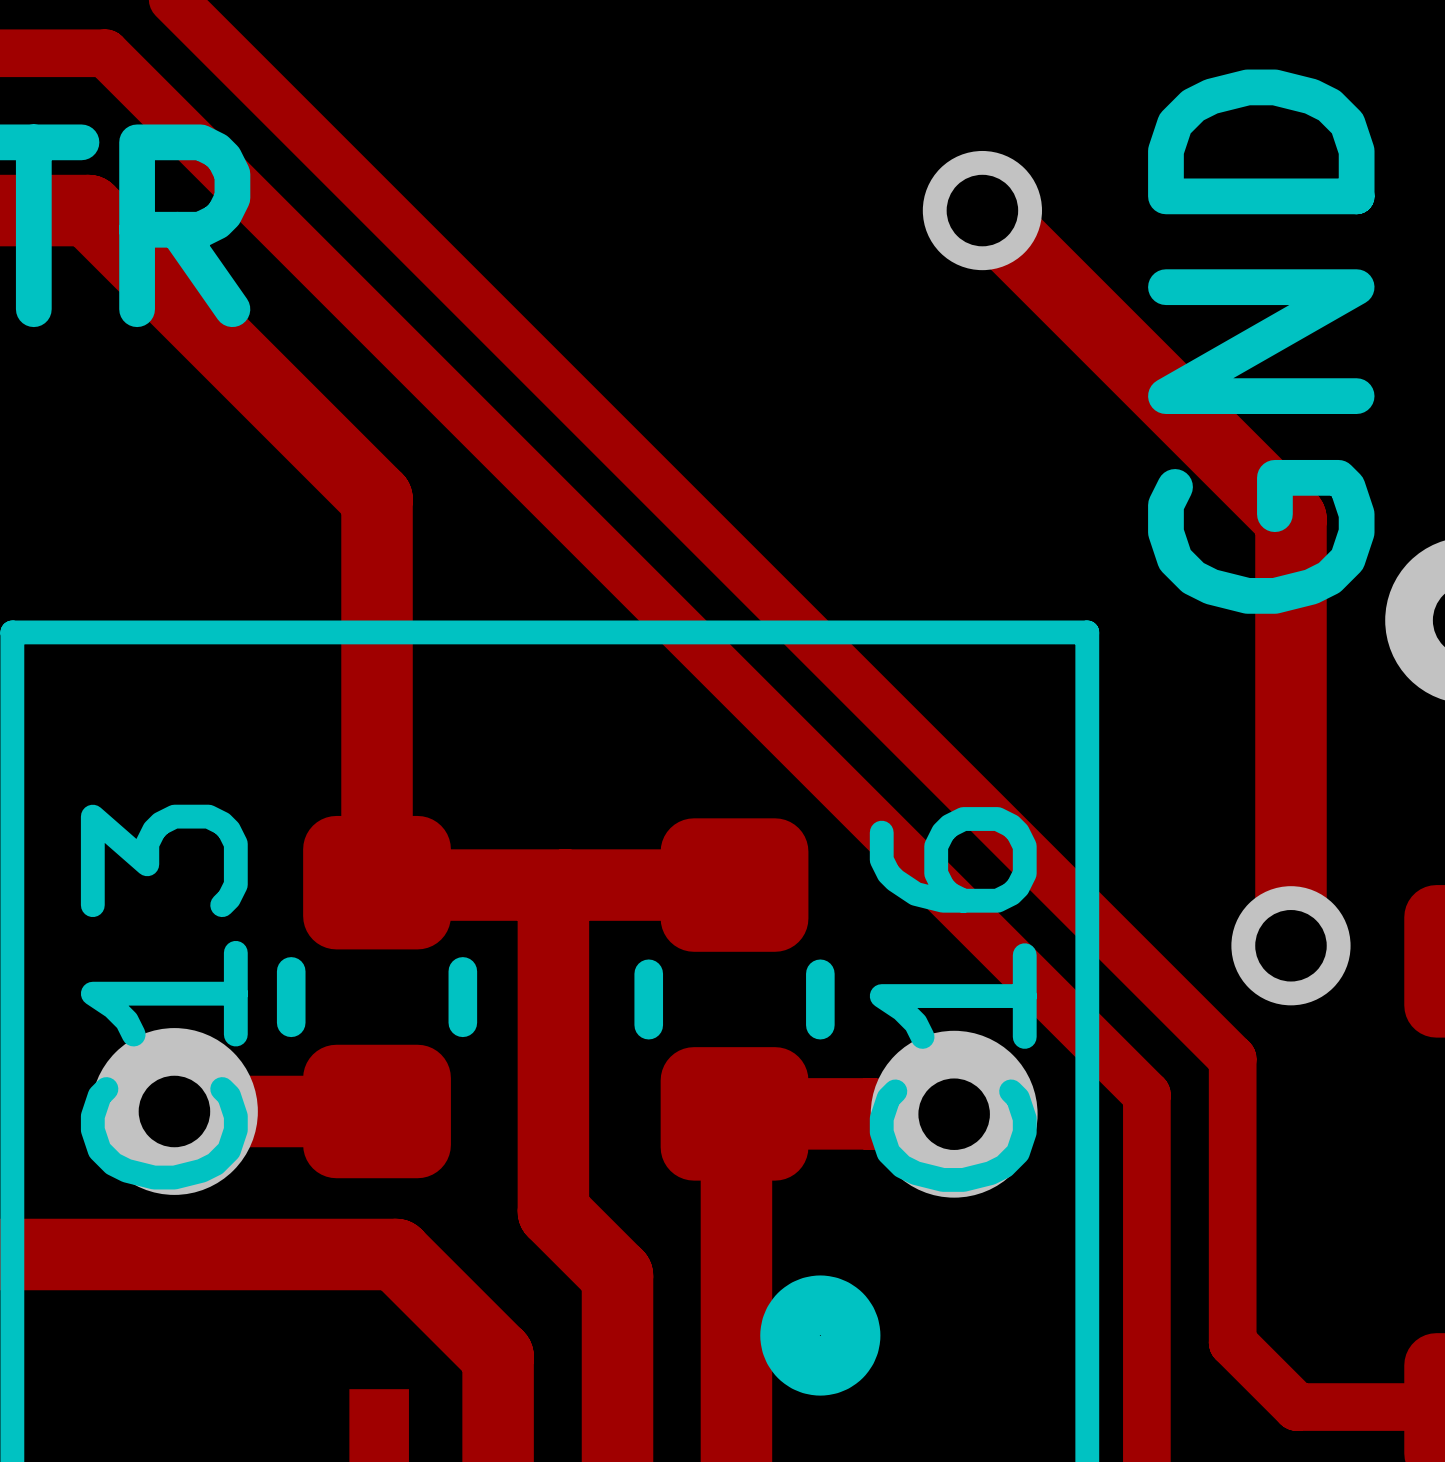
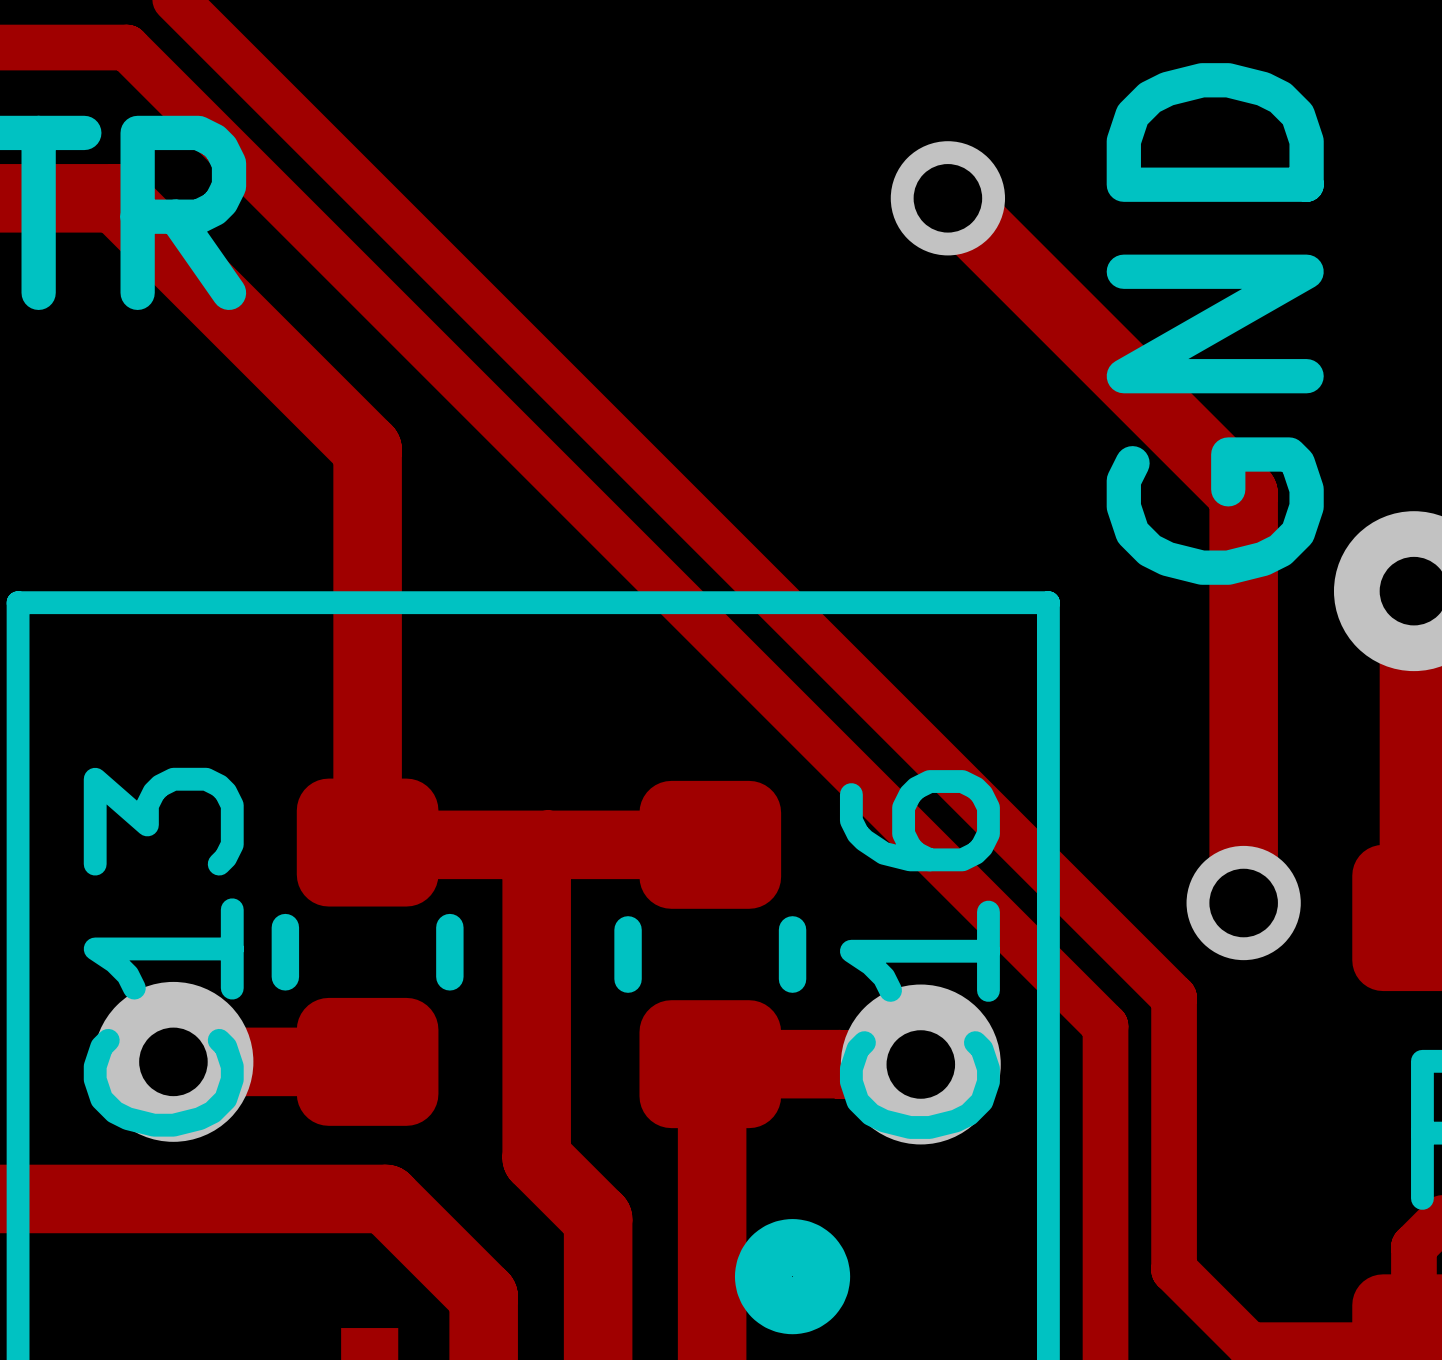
track: (105, 53) (1146, 1094) -> (107, 47) (126, 47) (1105, 1026) (1105, 1045)
track: (88, 210) (377, 498) -> (91, 198) (116, 198) (367, 449) (367, 474)
track: (1218, 1044) (1232, 1059) (1232, 1342) -> (1174, 997) (1174, 1269) (1187, 1283)

